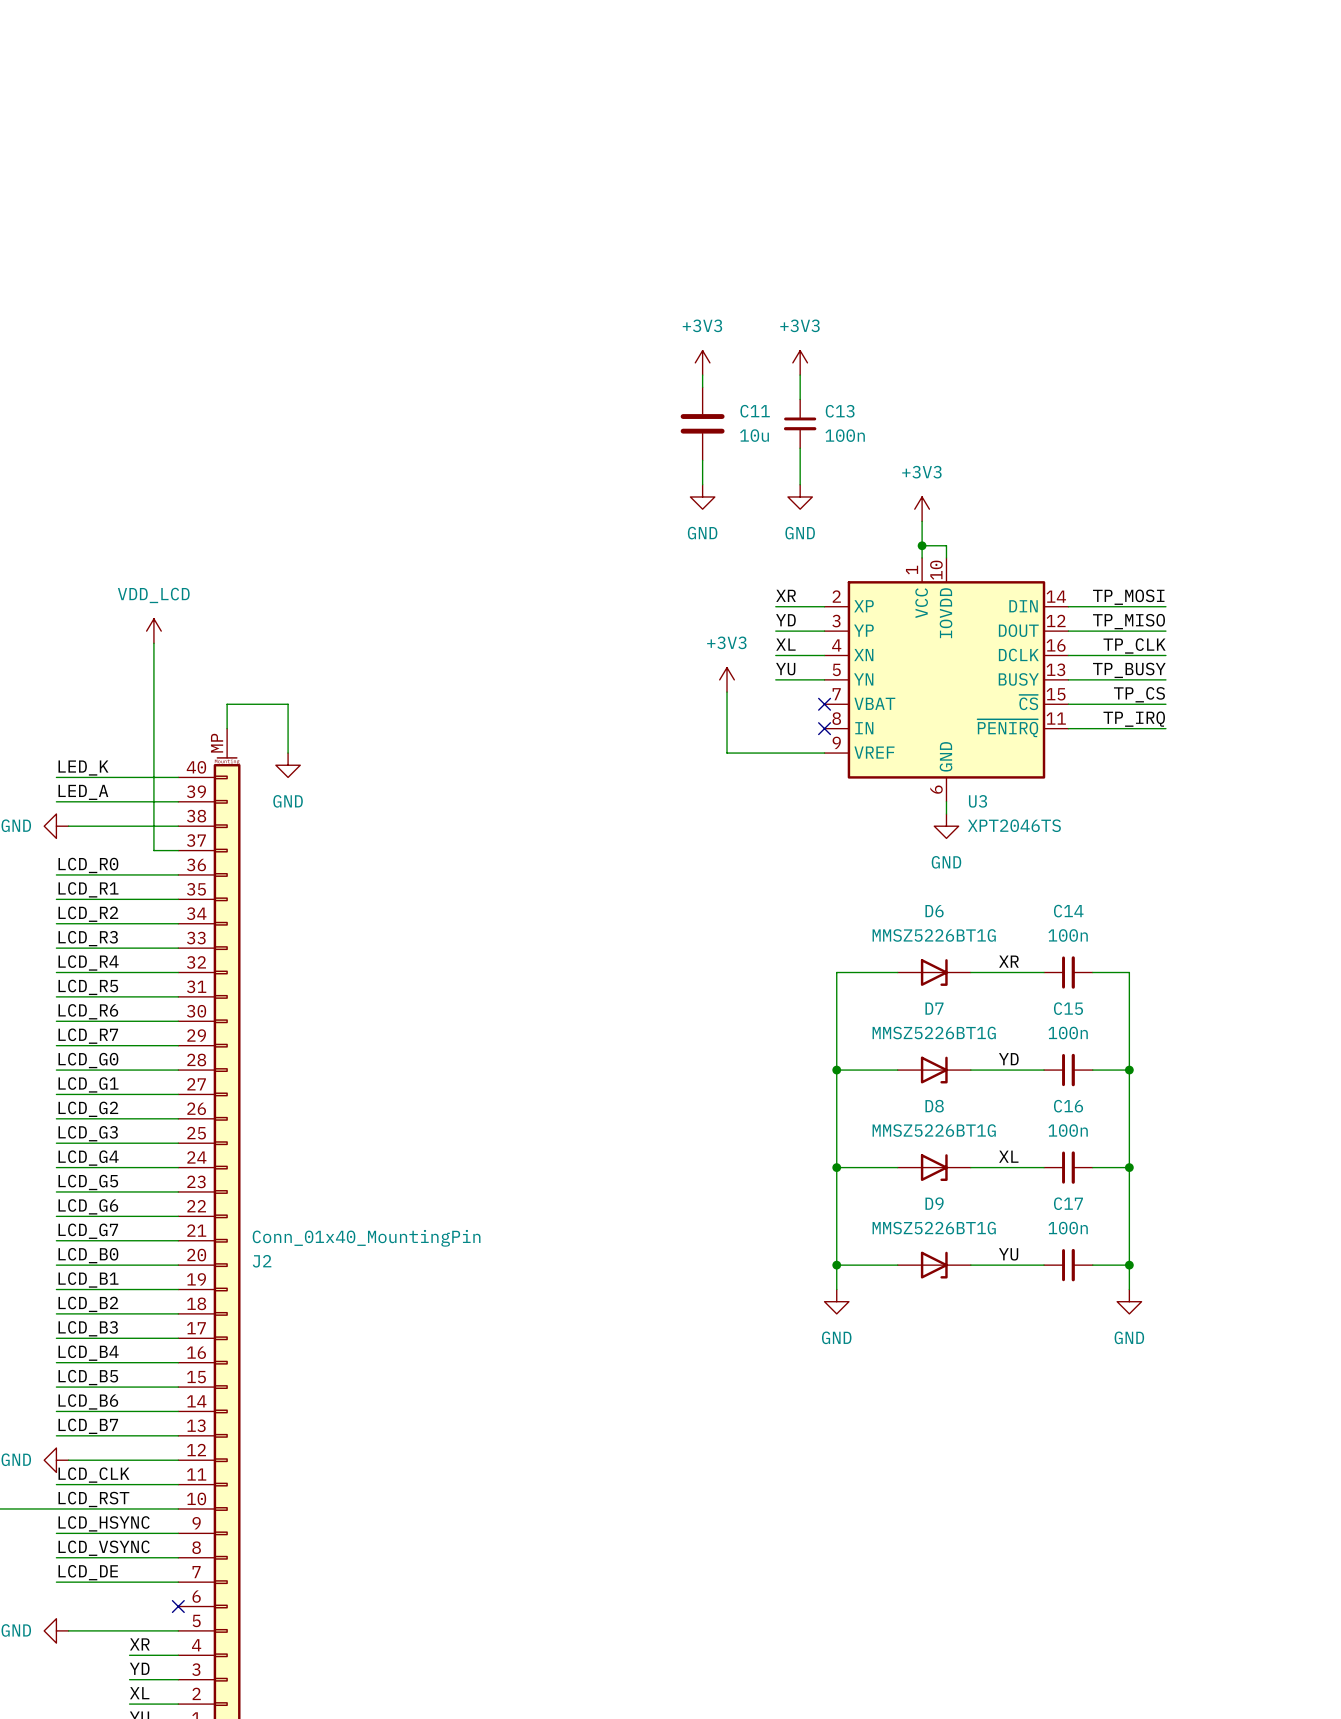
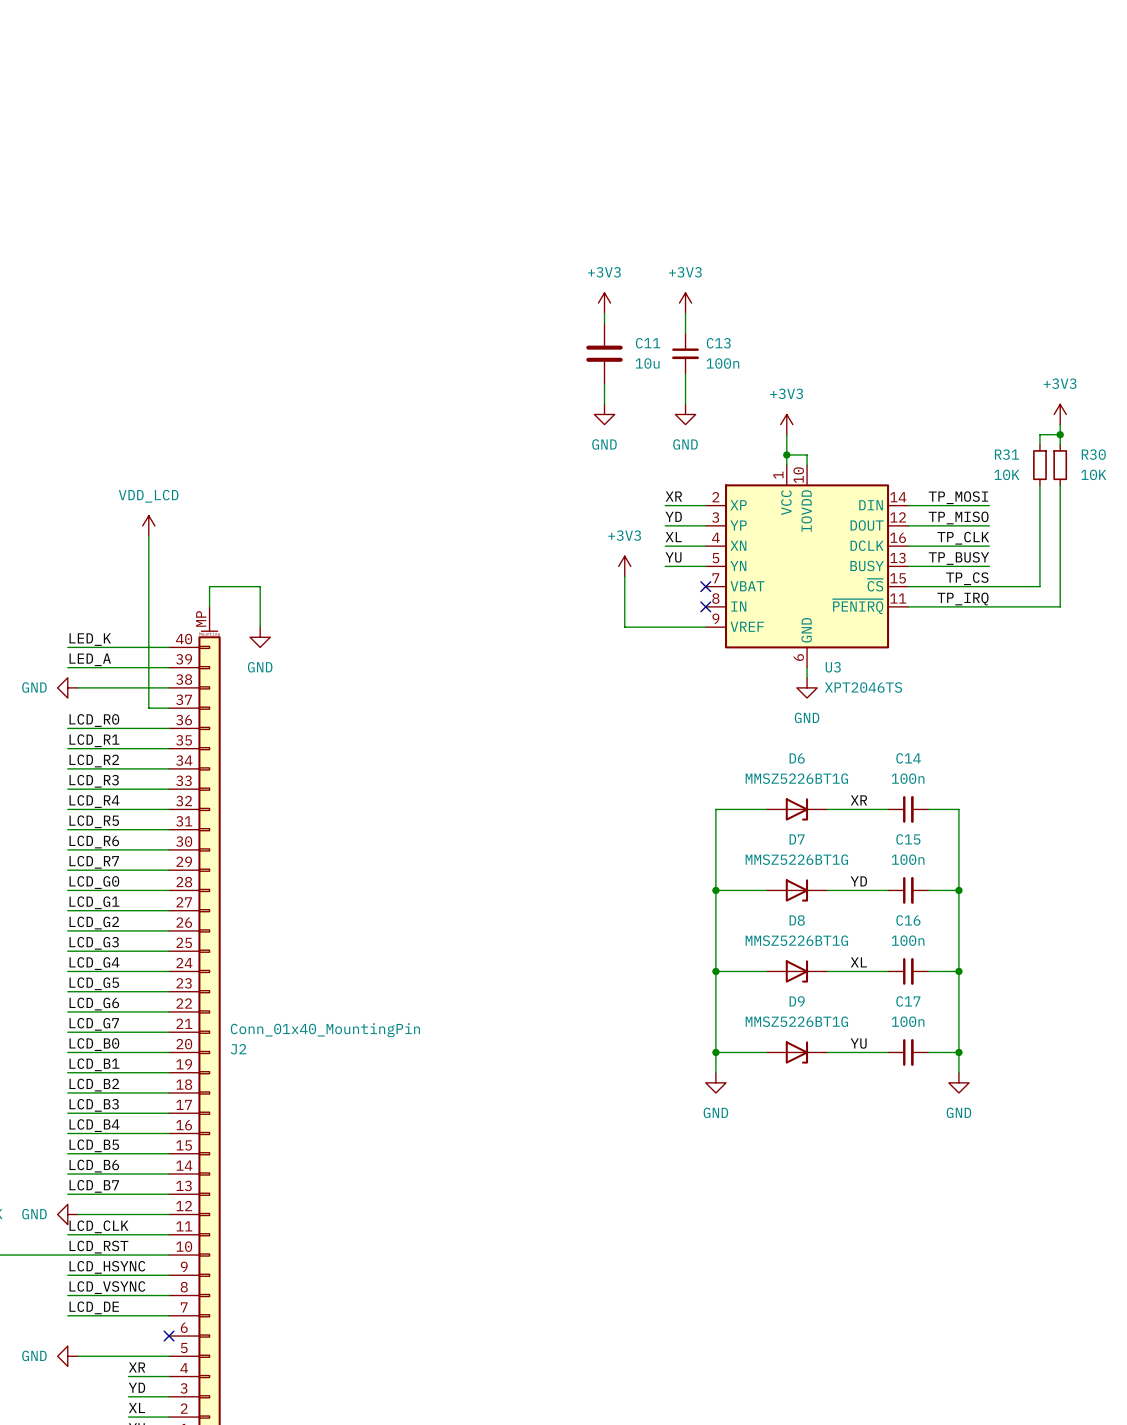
power symbol: none -> +3V3 (1060, 414)
wire: none -> (1060, 424) (1060, 444)
wire: none -> (1060, 434) (1039, 434) (1039, 444)
junction: none -> (1060, 434)
R31: none -> 10K (1039, 465)
R30: none -> 10K (1060, 465)
wire: none -> (1039, 485) (1039, 586) (989, 586)
wire: none -> (1060, 485) (1060, 606) (989, 606)

